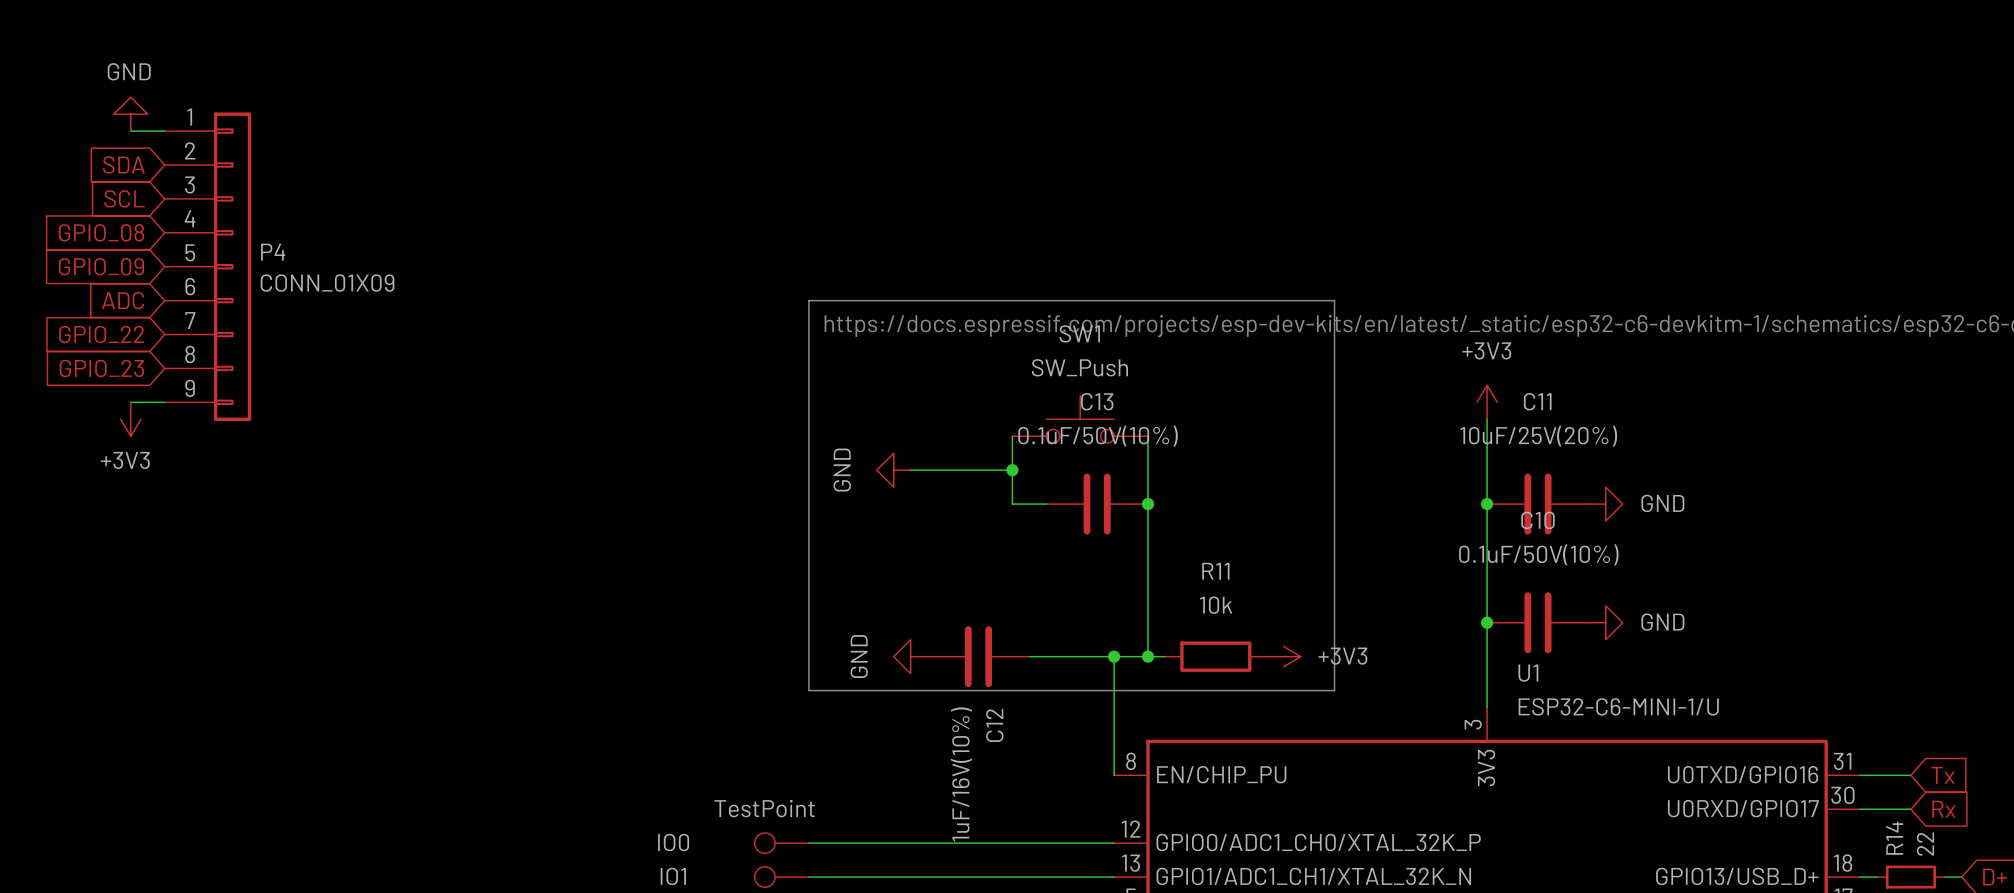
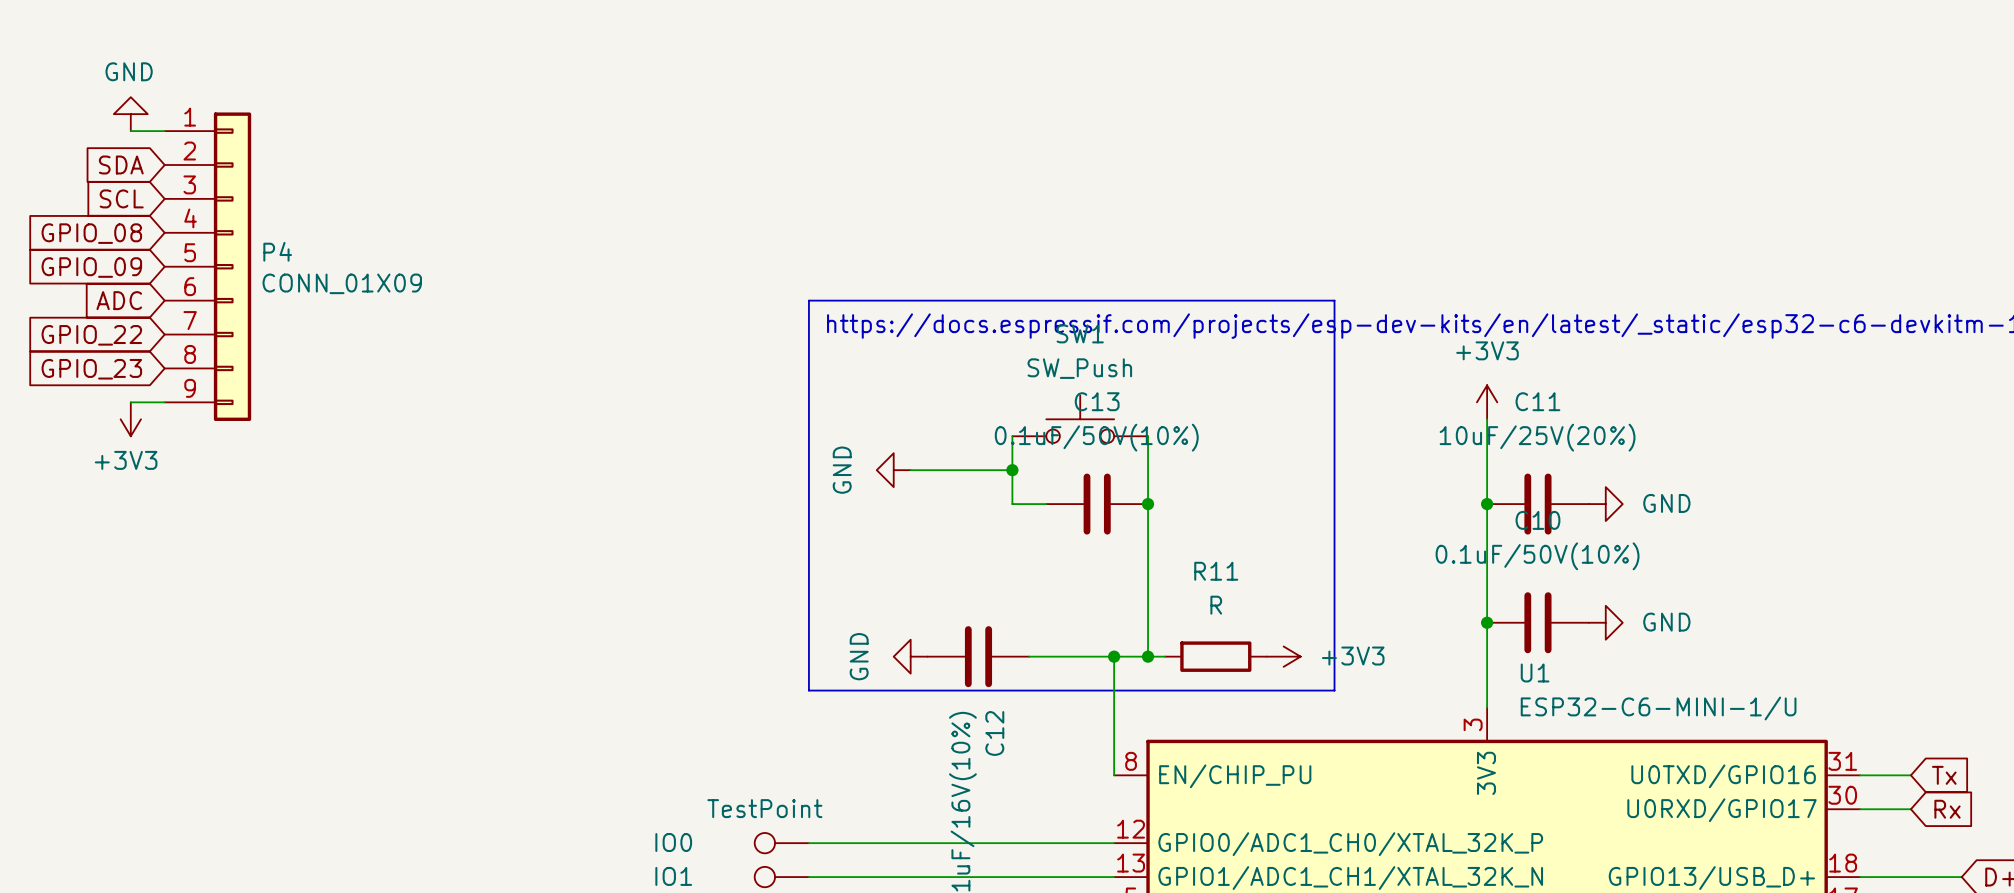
R11 value: 10k (1216, 605) -> R (1216, 605)
wire: none -> (1877, 877) (1944, 877)
R14: 22 (1910, 877) -> none

